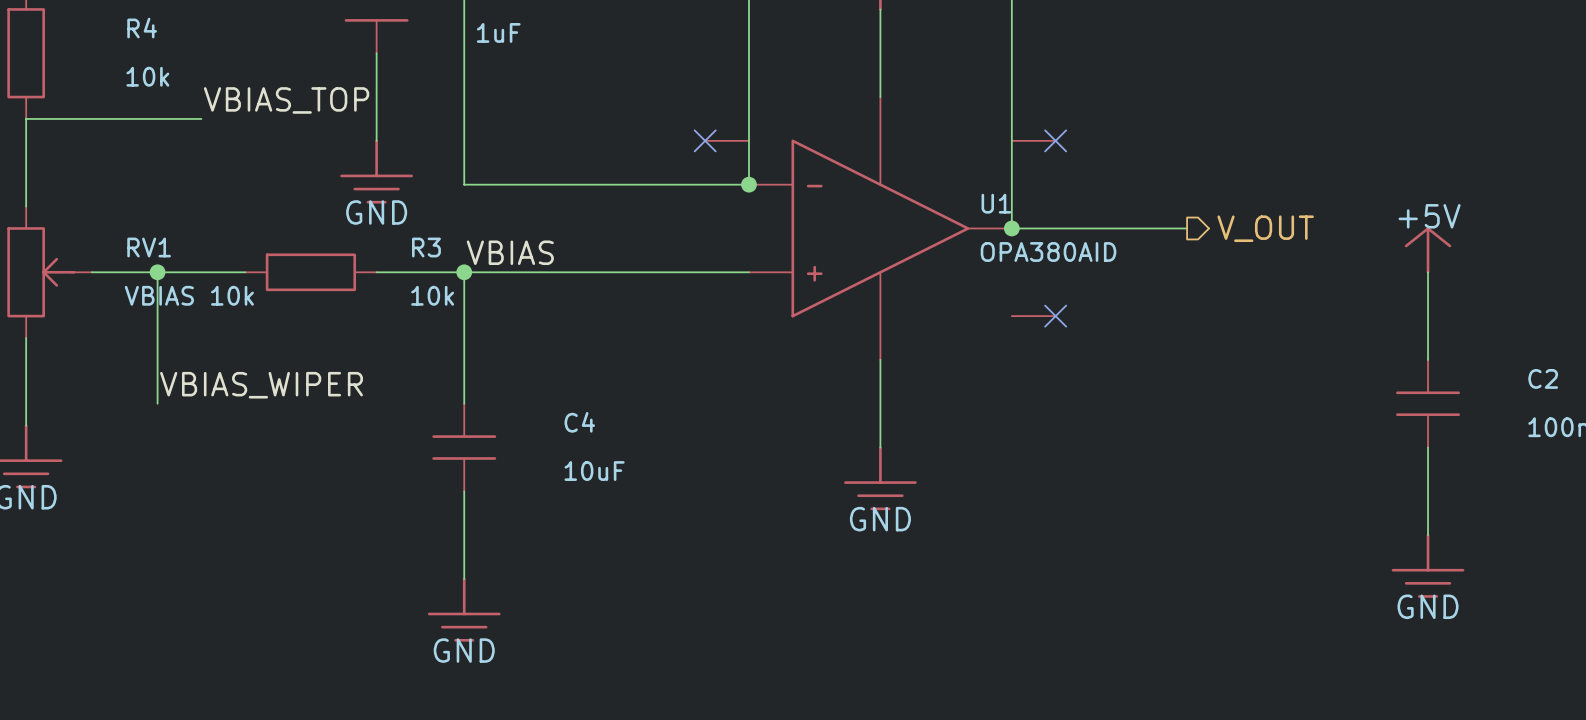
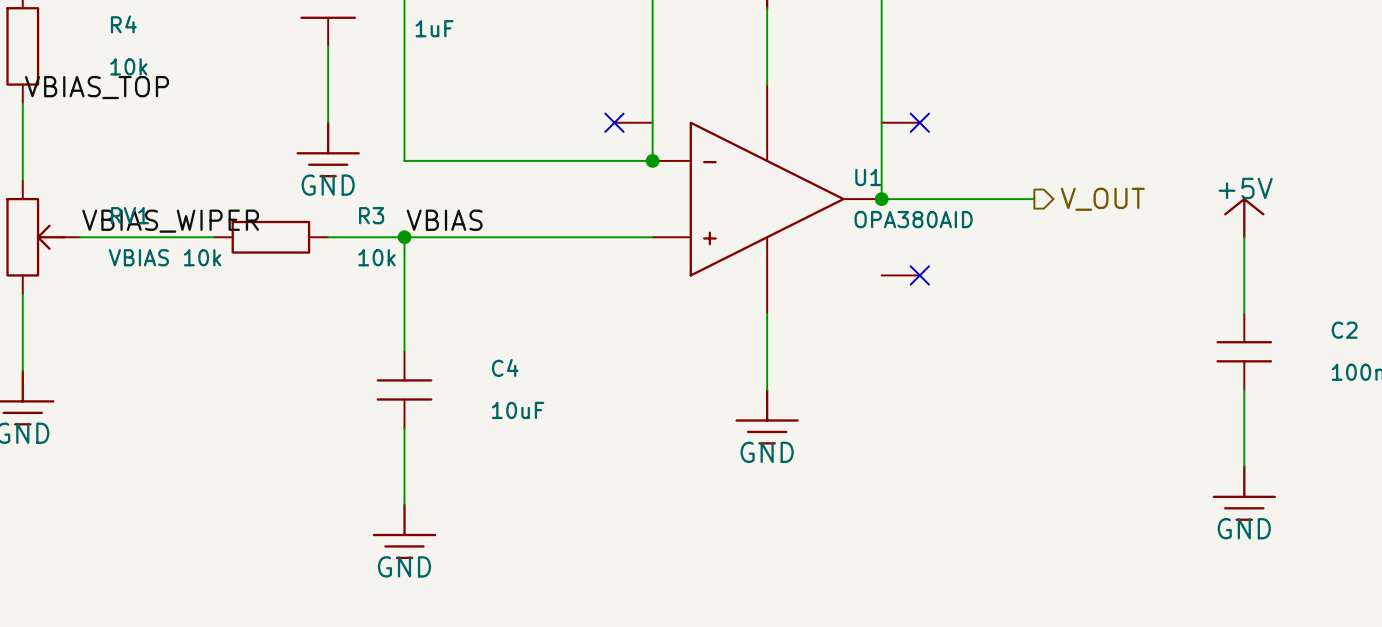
label position: VBIAS_TOP (286, 100) -> VBIAS_TOP (97, 87)
wire: (26, 118) (201, 118) -> none
wire: (157, 272) (157, 403) -> none
junction: (157, 272) -> none
label position: VBIAS_WIPER (261, 385) -> VBIAS_WIPER (170, 221)

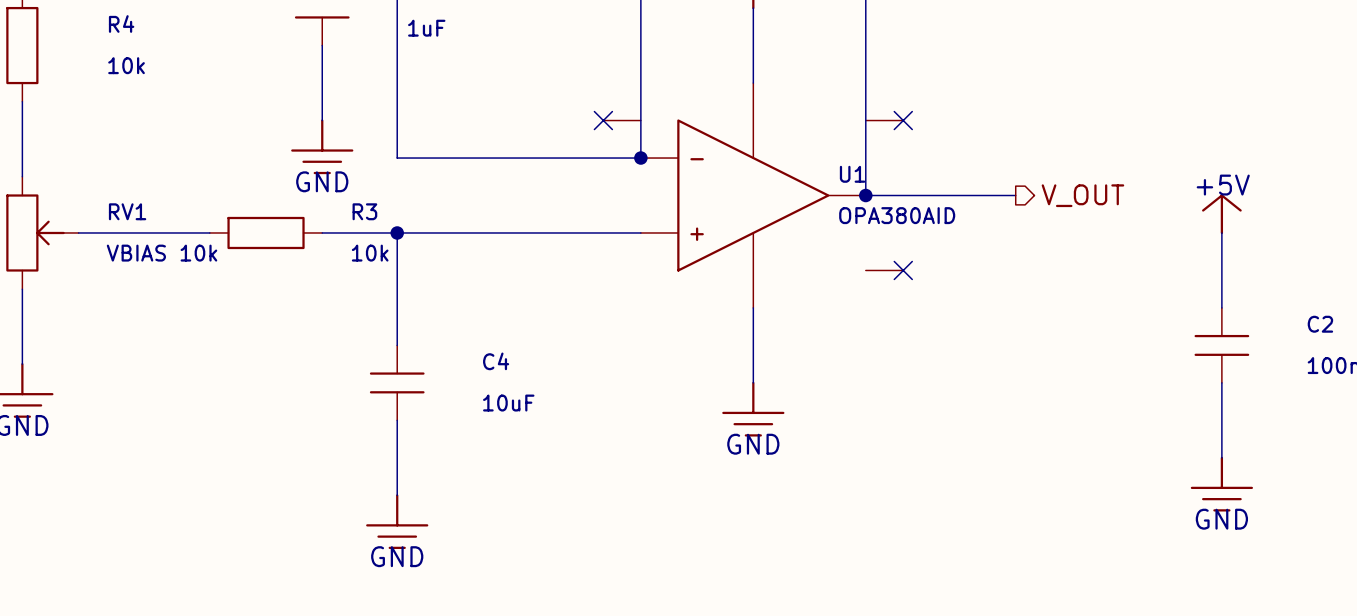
label: VBIAS_TOP (97, 87) -> none
label: VBIAS (444, 220) -> none
label: VBIAS_WIPER (170, 221) -> none

